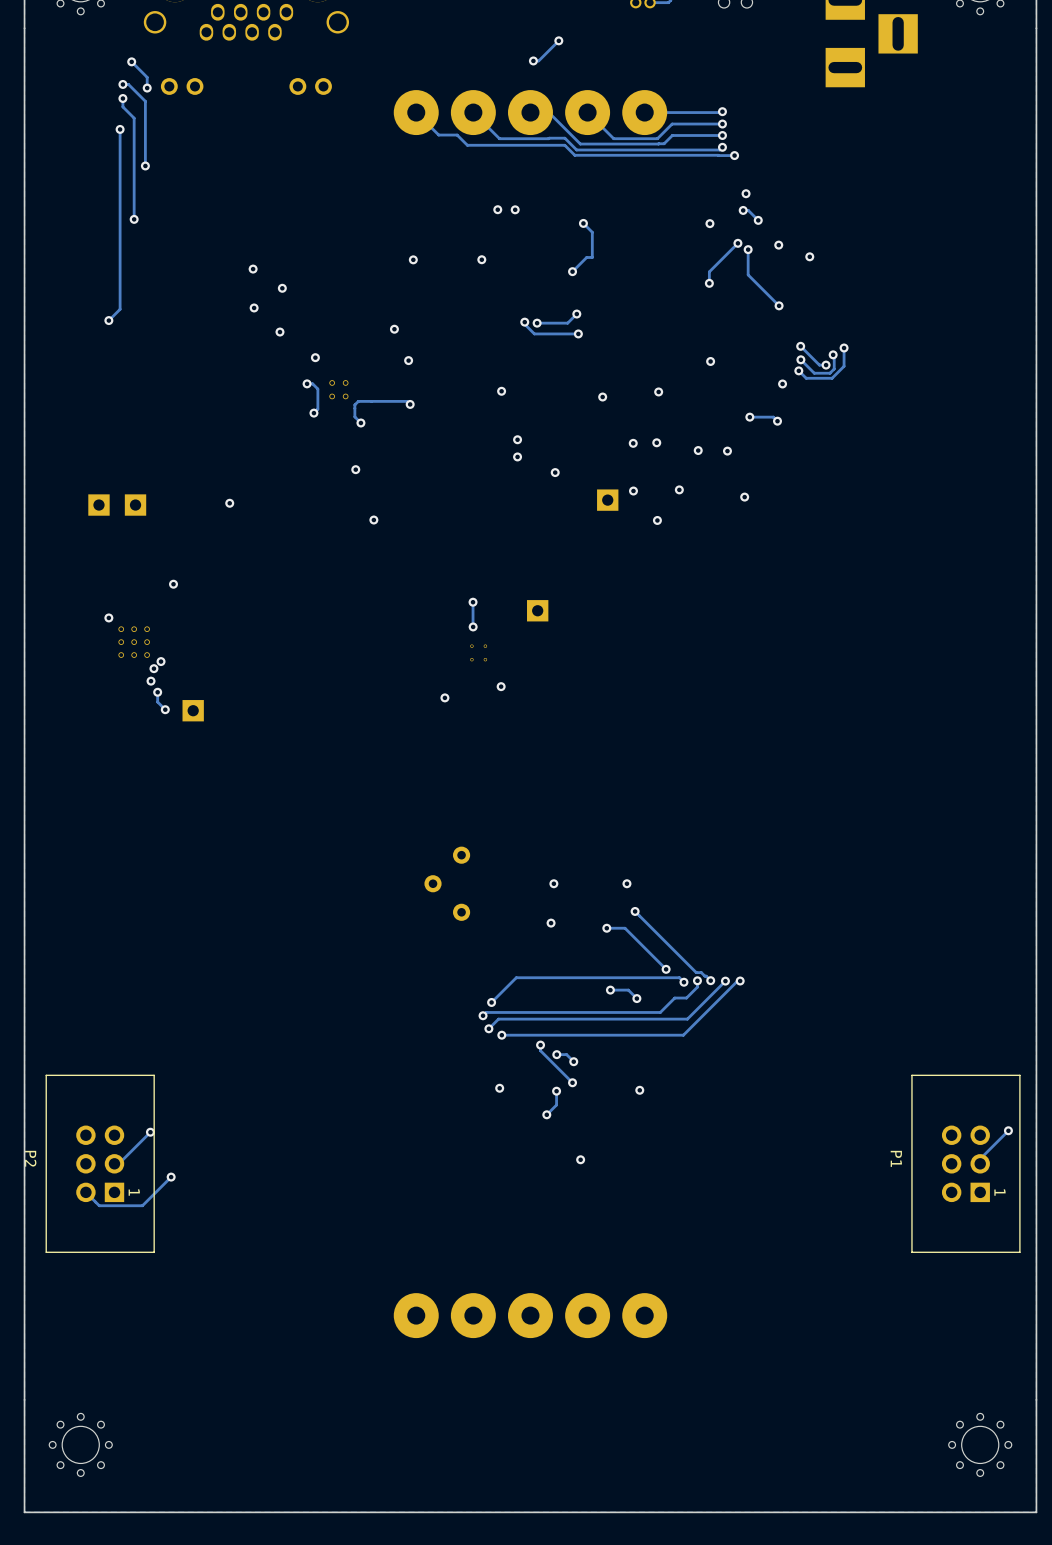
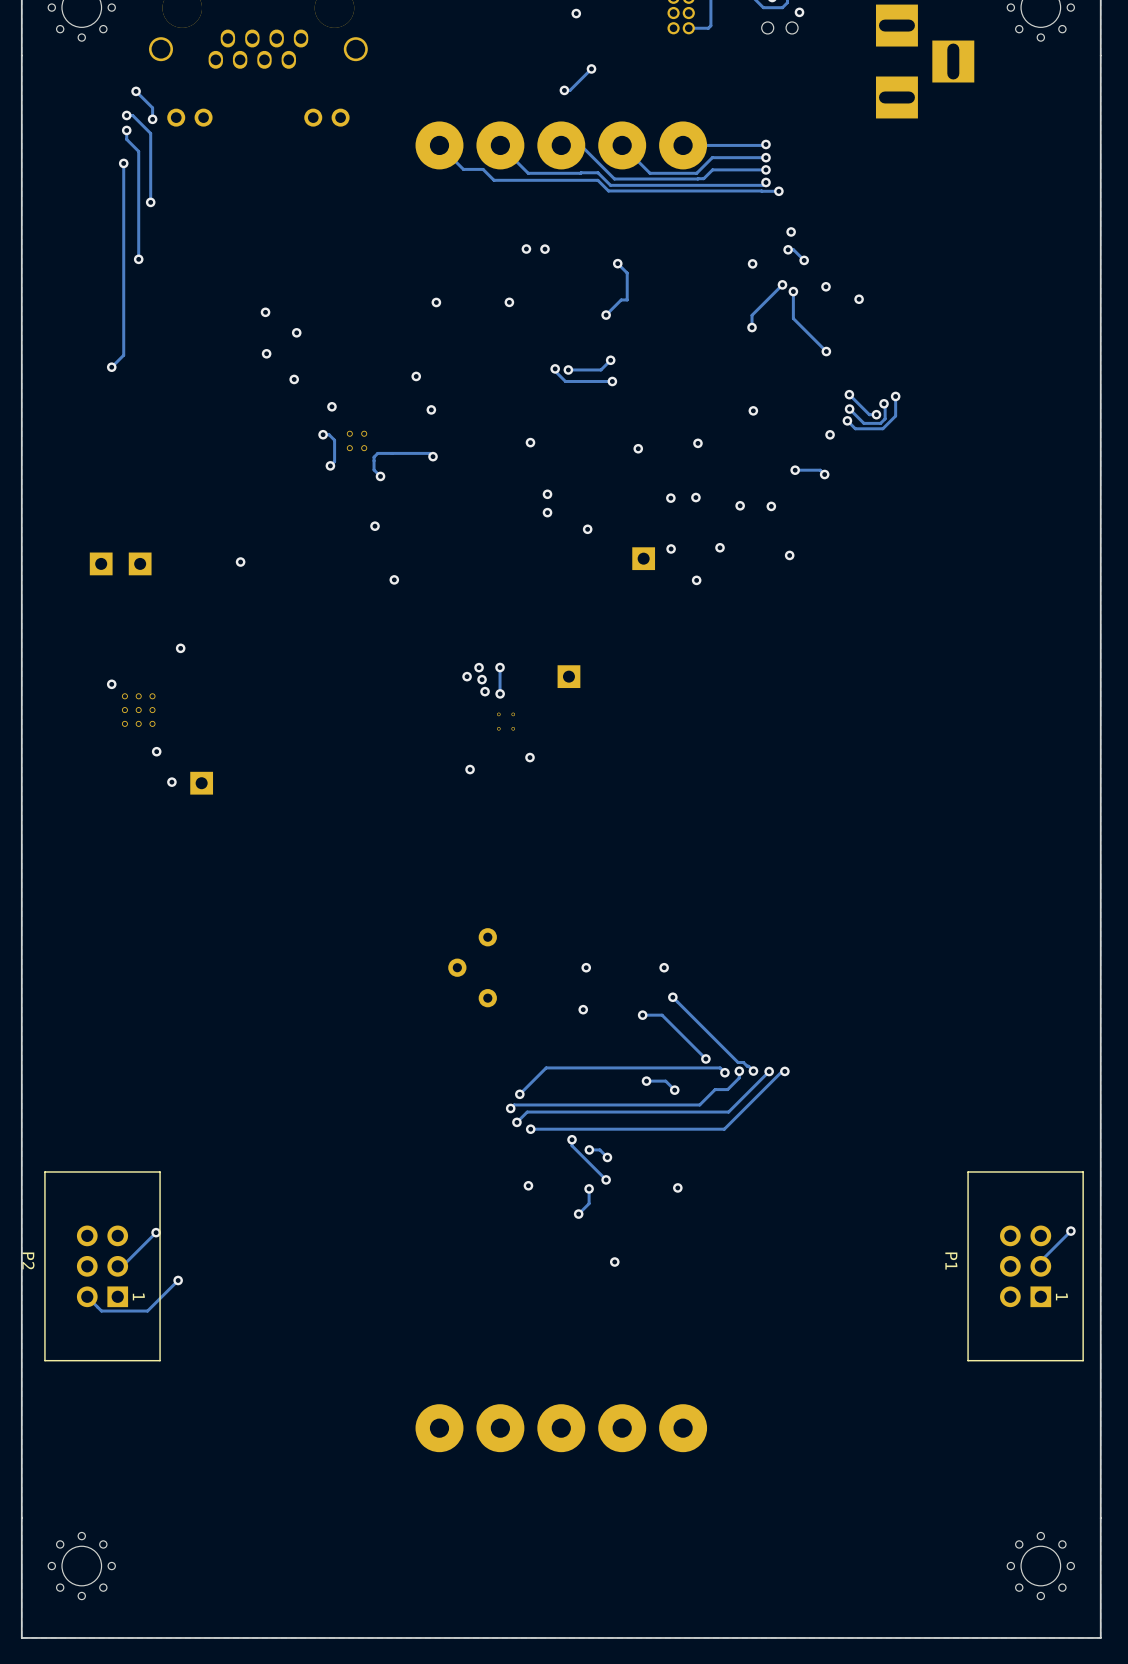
via: none -> (479, 667)
via: none -> (467, 676)
via: none -> (482, 679)
via: none -> (485, 691)
via: (161, 661) -> none
via: (153, 668) -> none
via: (157, 692) -> none
track: (158, 692) (157, 702) (165, 709) -> none

